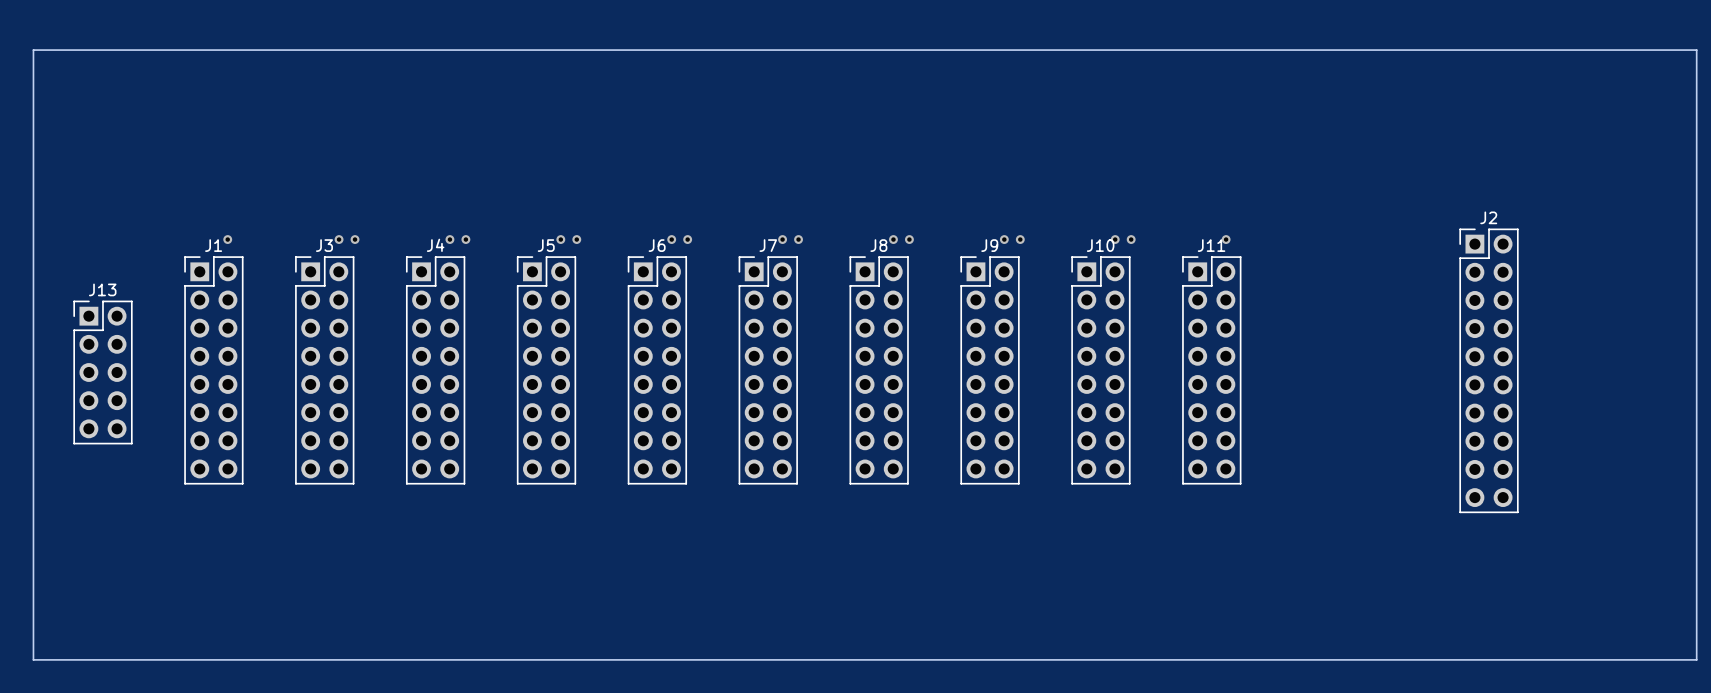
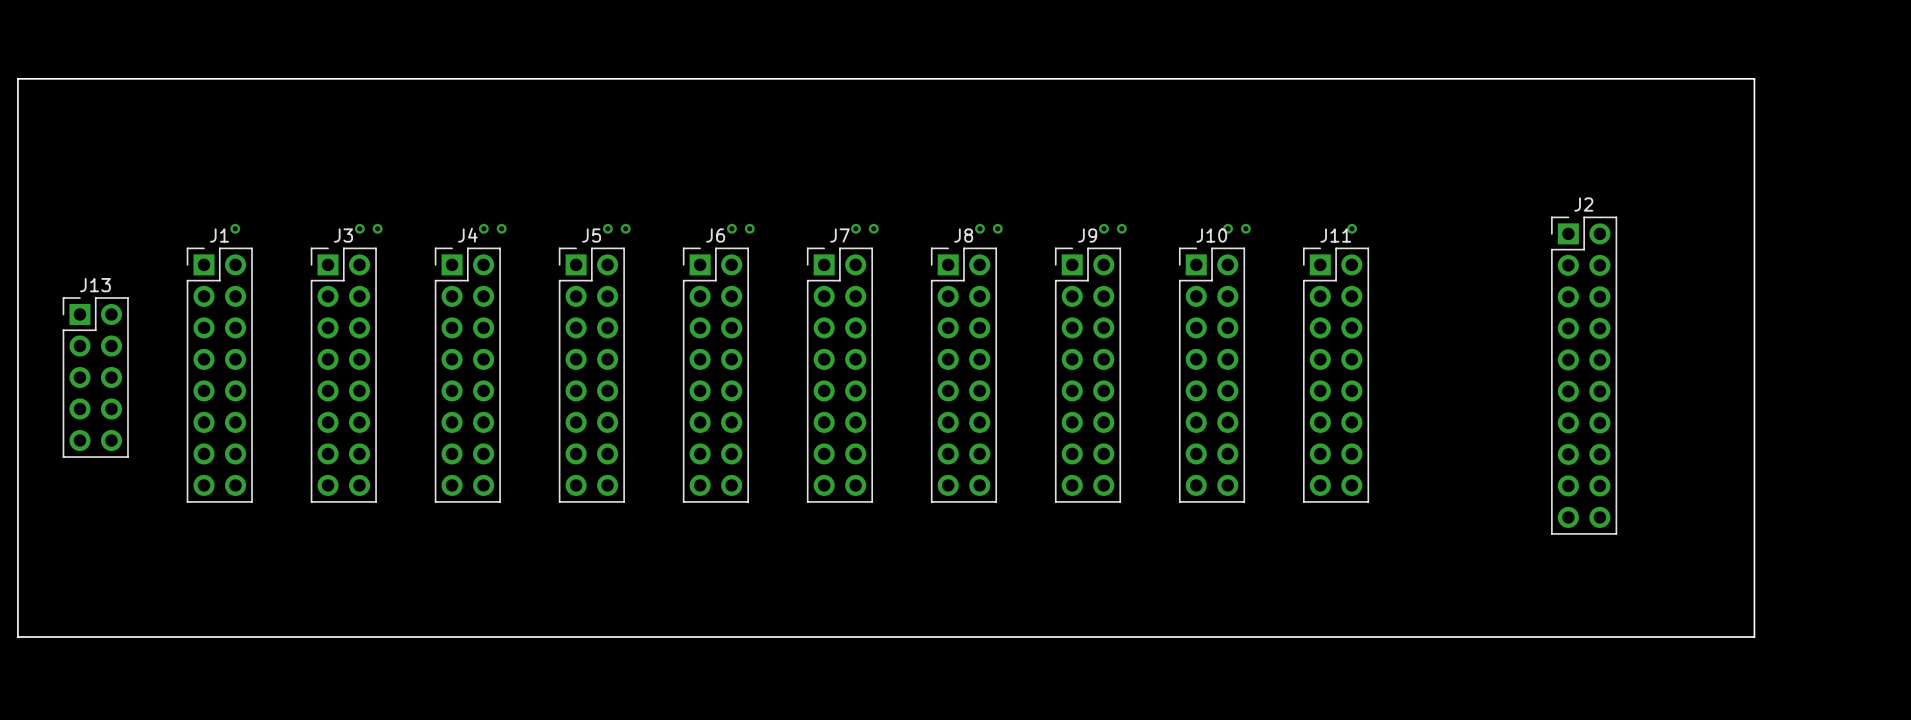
board edge: (33, 105) (33, 50) (1696, 50) (1696, 659) (33, 659) (33, 604) -> (17, 78) (1754, 78) (1754, 636) (17, 636)
J2 position: (1489, 370) -> (1584, 375)

